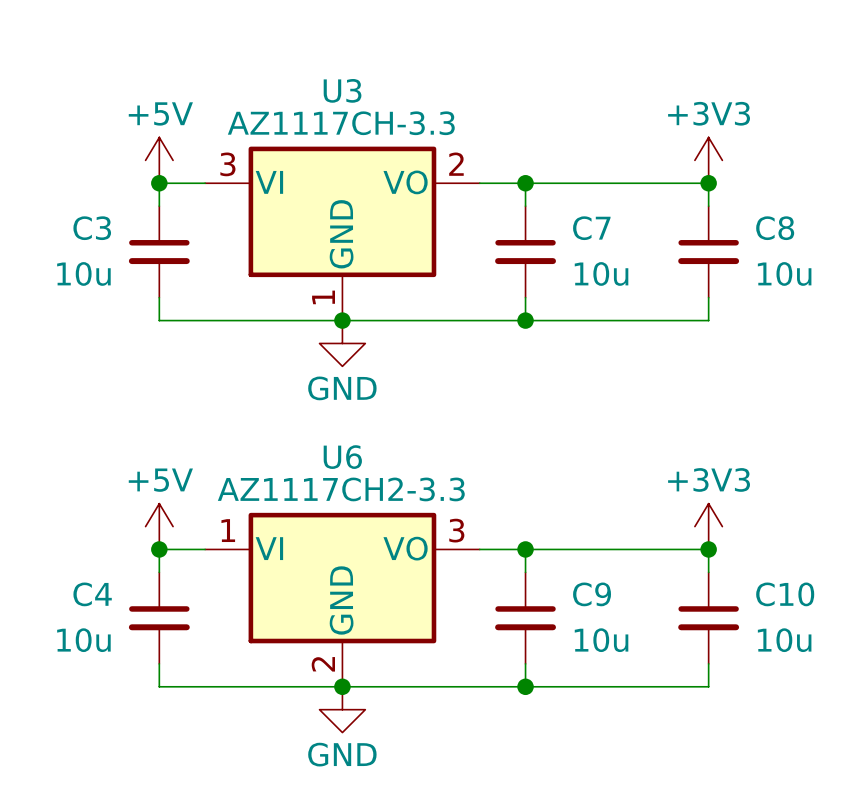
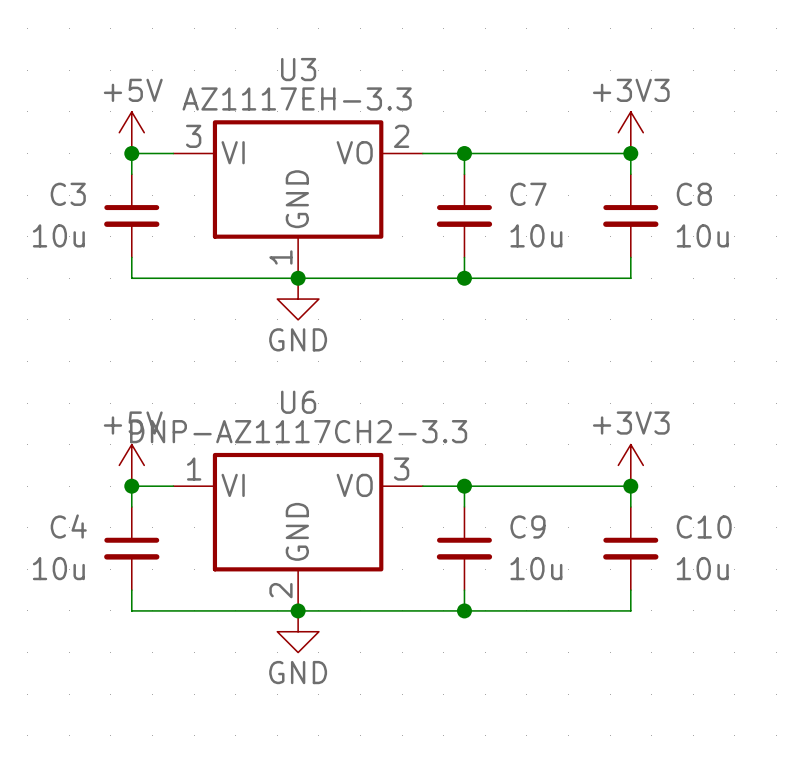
U3 value: AZ1117CH-3.3 (341, 123) -> AZ1117EH-3.3 (297, 98)
U6 value: AZ1117CH2-3.3 (341, 489) -> DNP-AZ1117CH2-3.3 (298, 431)

